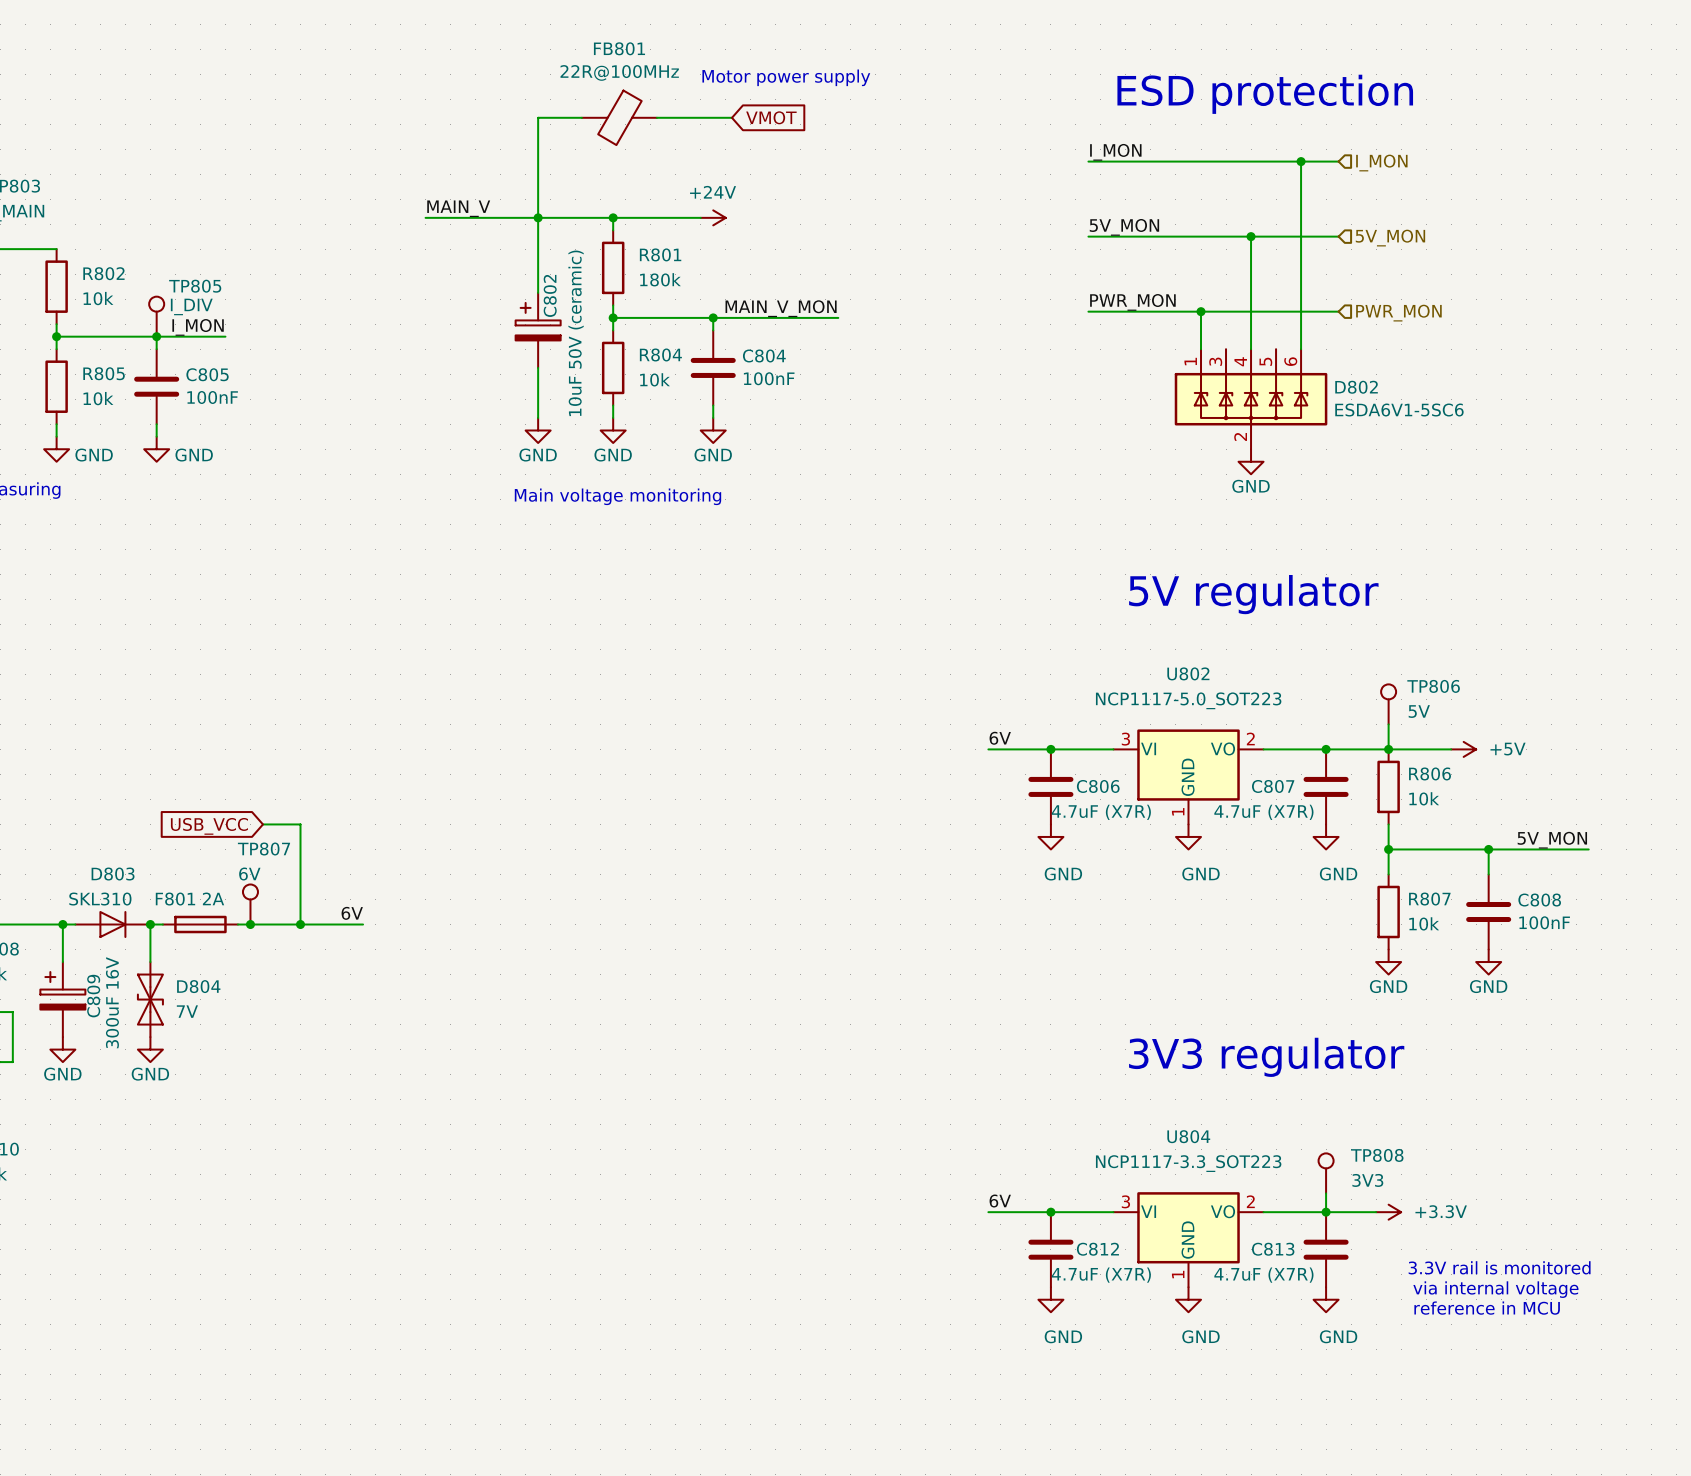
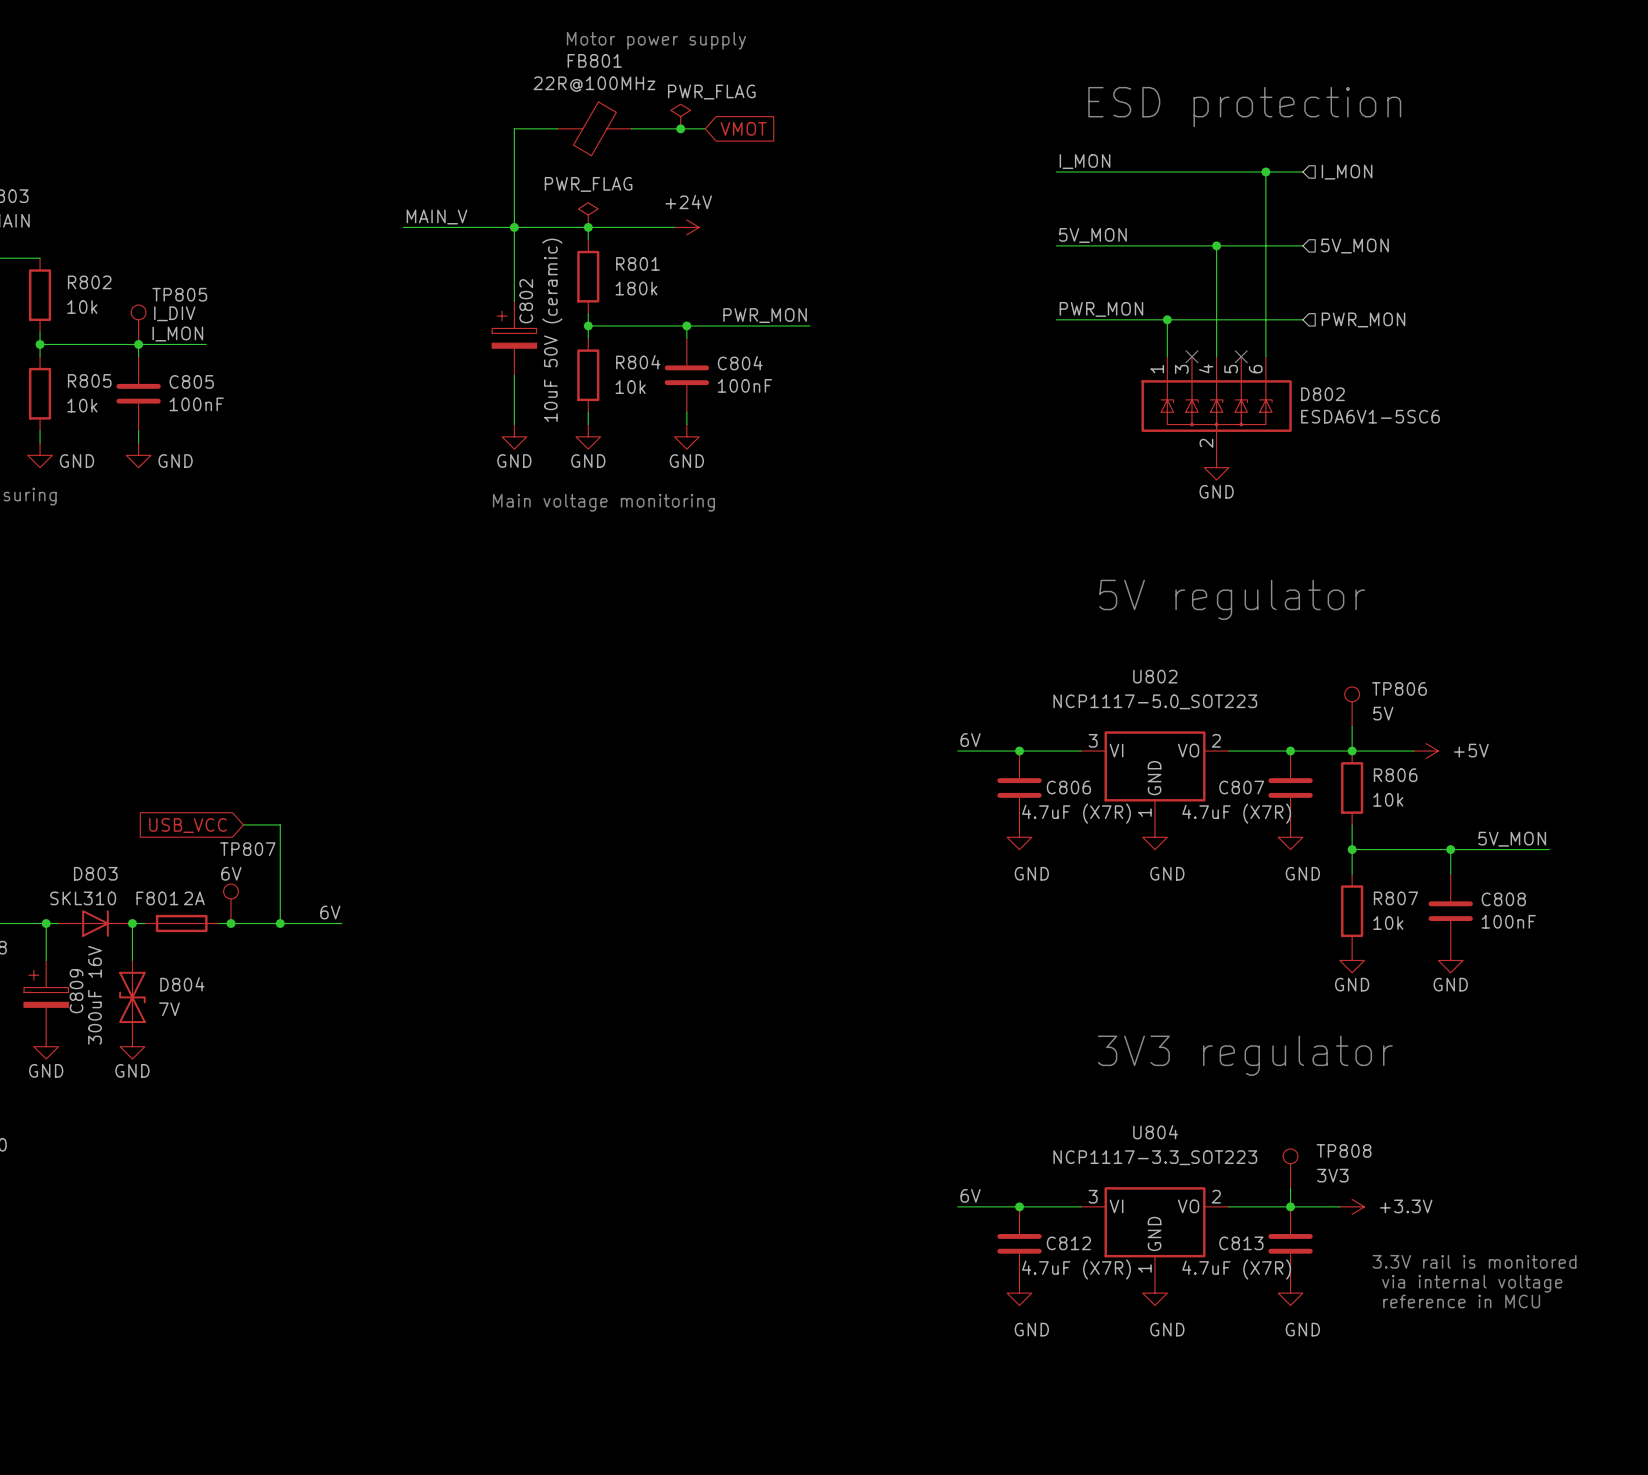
text position: Motor power supply (786, 77) -> Motor power supply (656, 40)
power symbol: none -> PWR_FLAG (680, 116)
junction: none -> (680, 128)
power symbol: none -> PWR_FLAG (588, 215)
label: MAIN_V_MON (781, 308) -> PWR_MON (765, 315)
no-connect mark: none -> (1191, 356)
no-connect mark: none -> (1241, 356)

